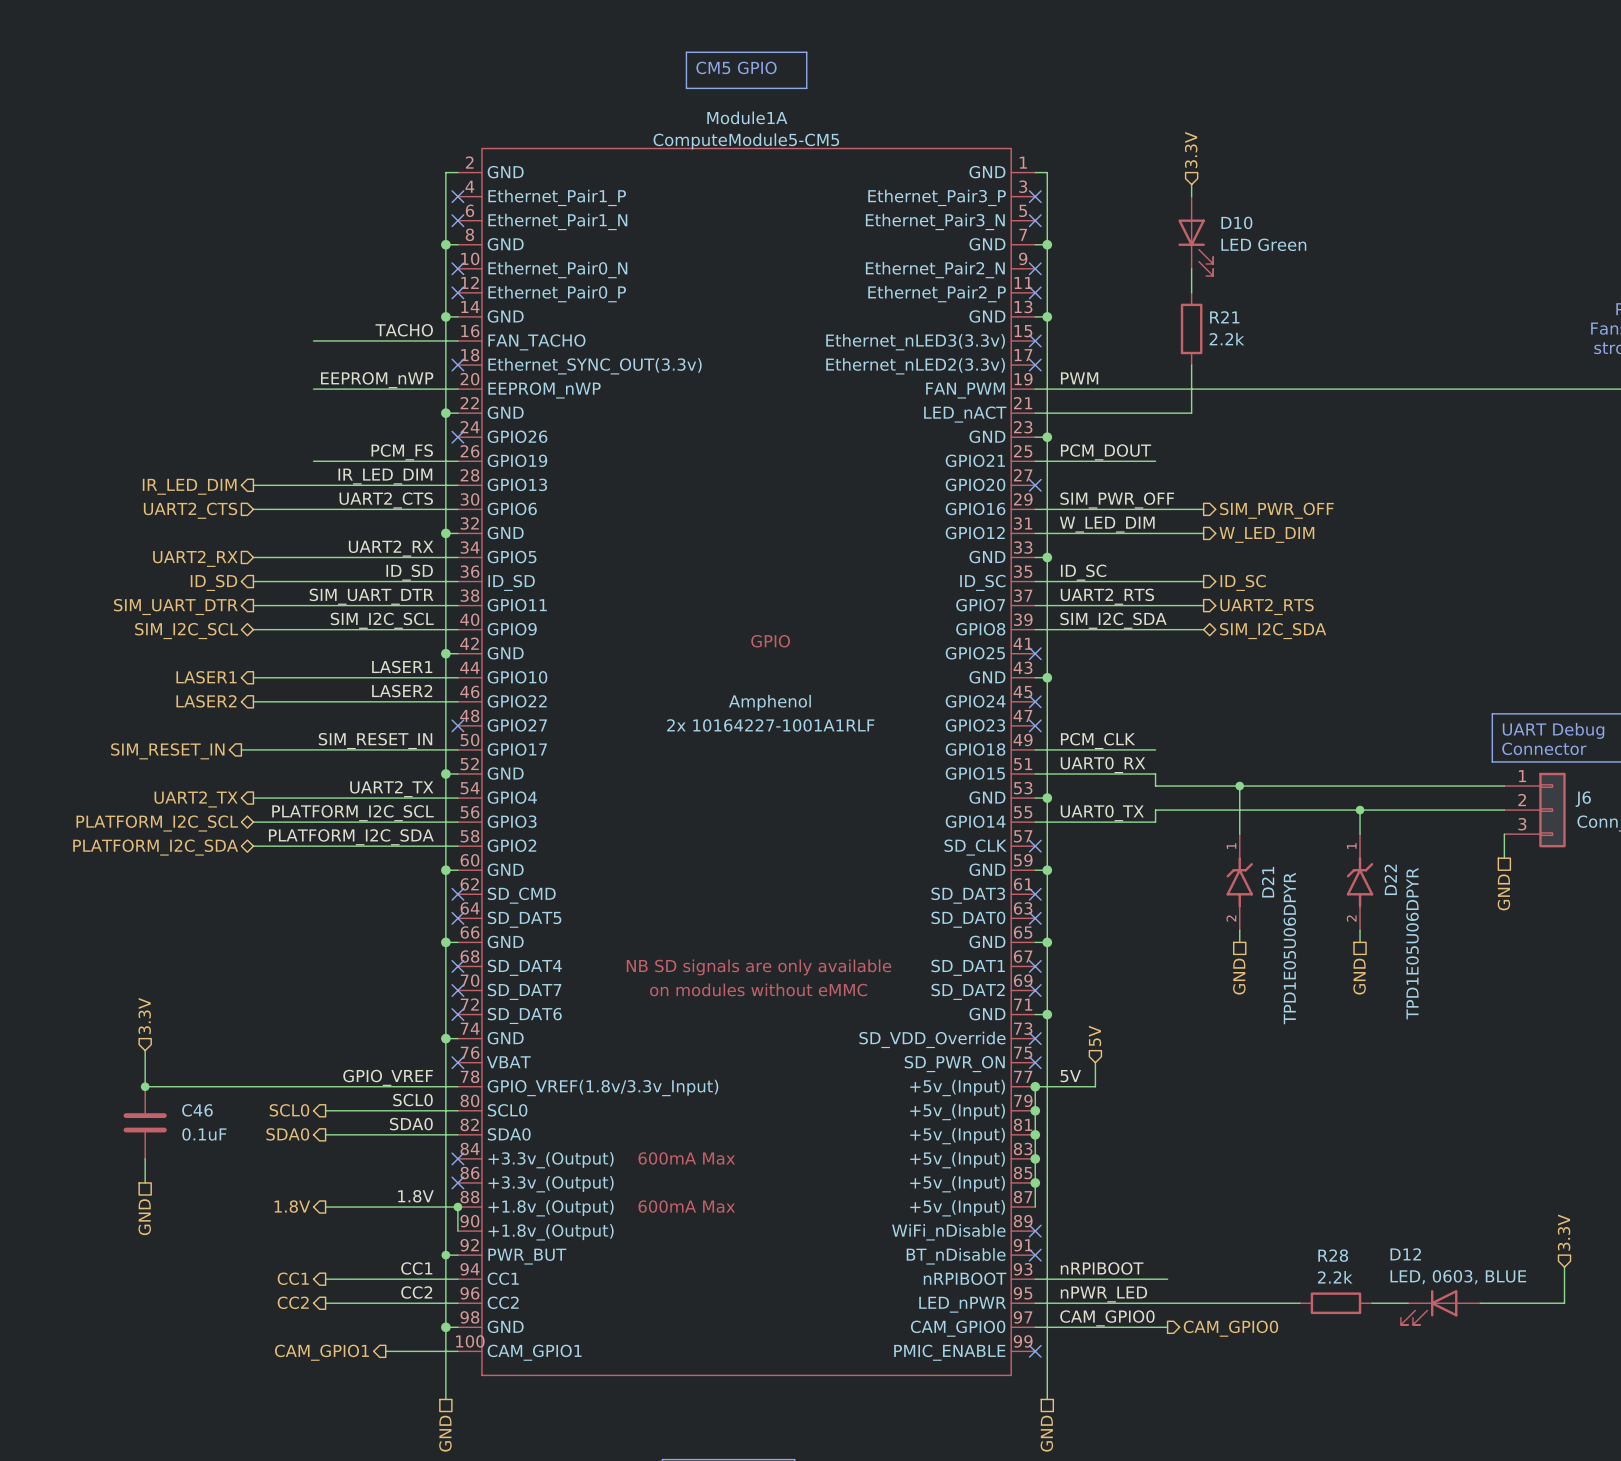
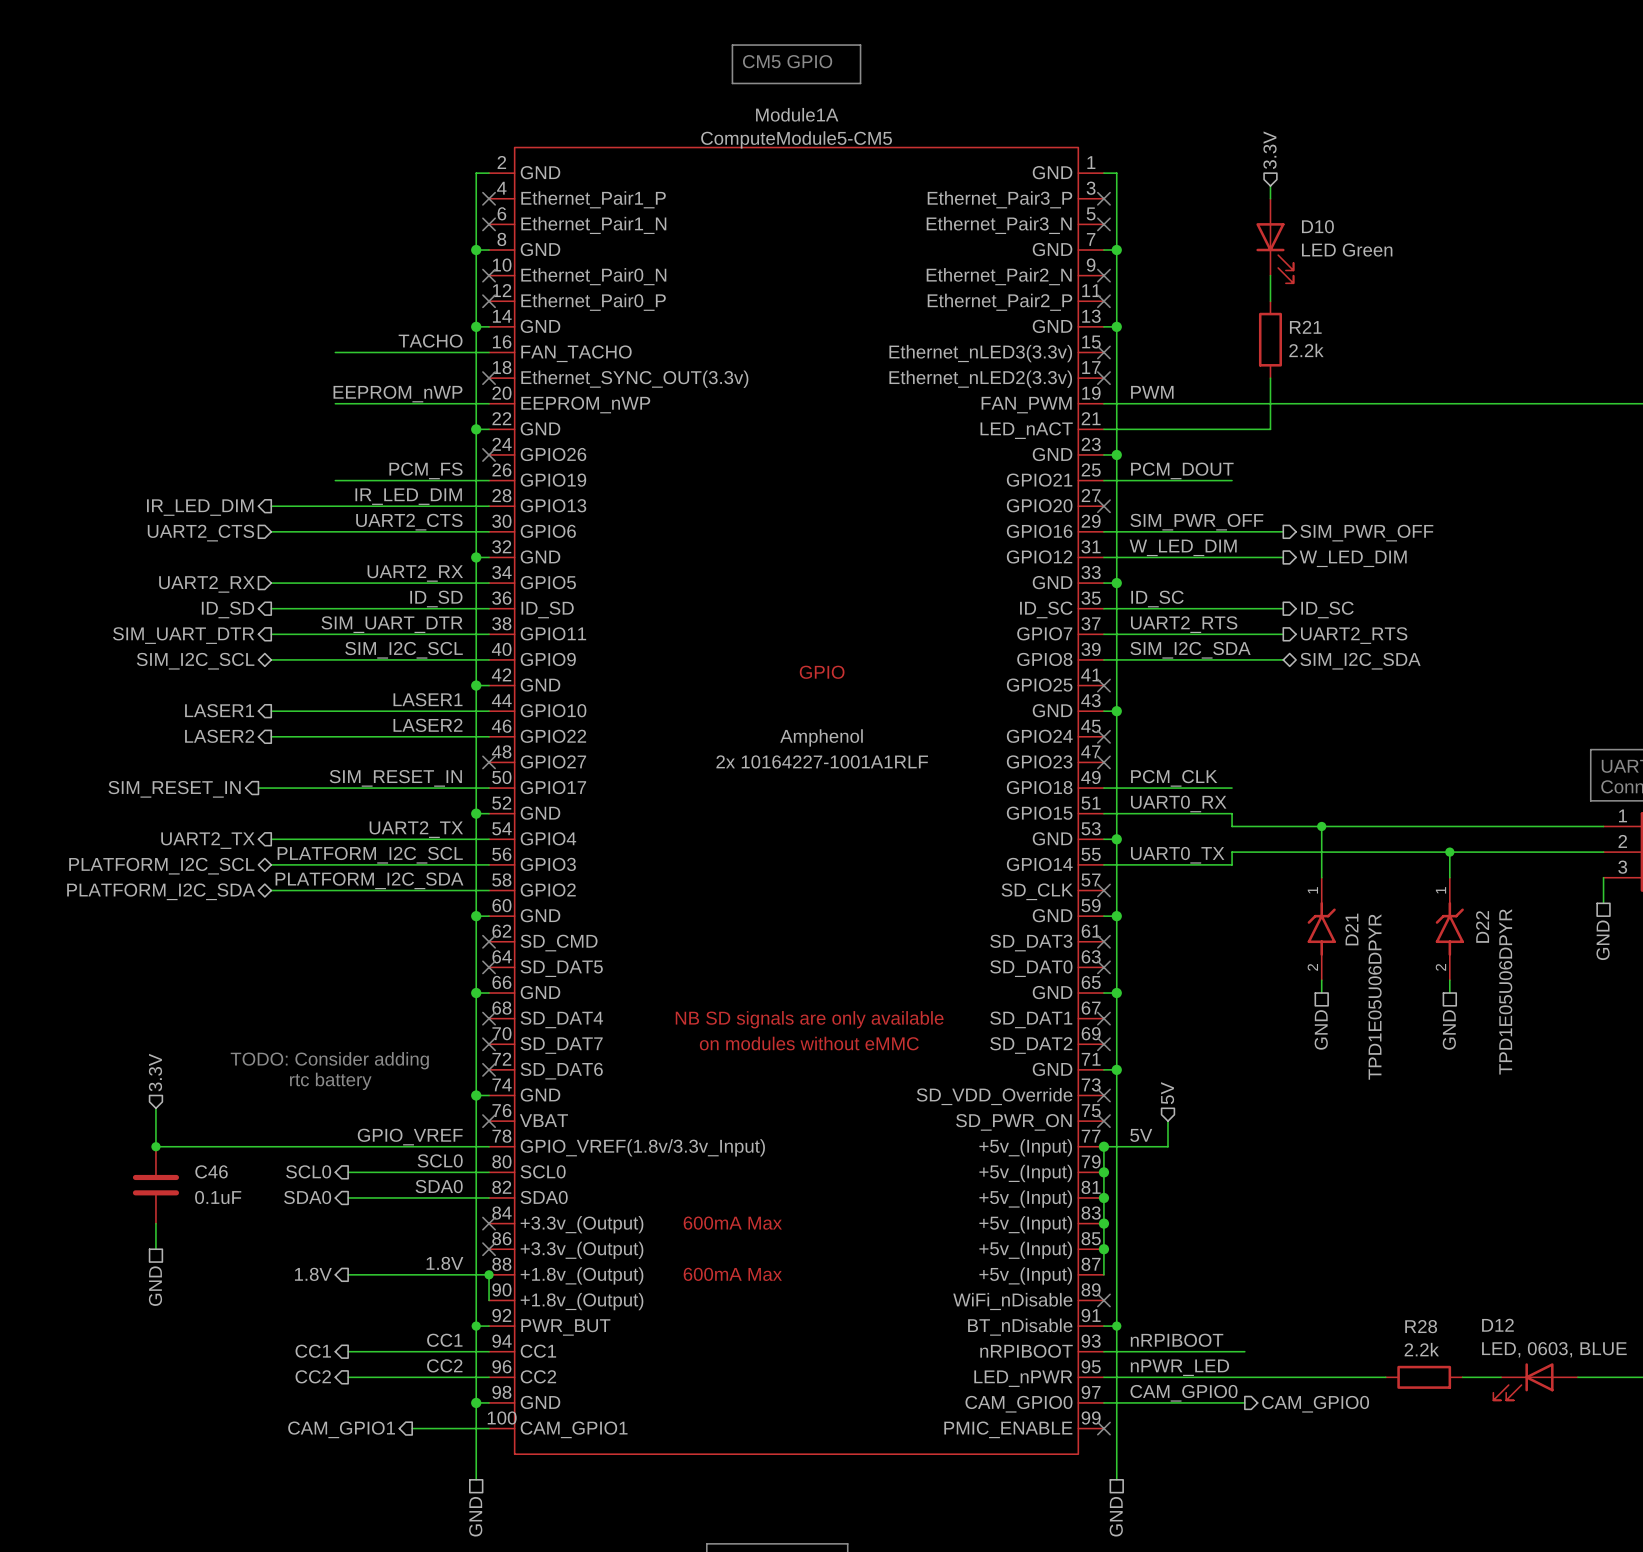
text: none -> TODO: Consider adding (329, 1060)
text: none -> rtc battery (330, 1081)
wire: none -> (1103, 1326) (1116, 1326)
no-connect mark: (1035, 1255) -> none
junction: none -> (1116, 1326)

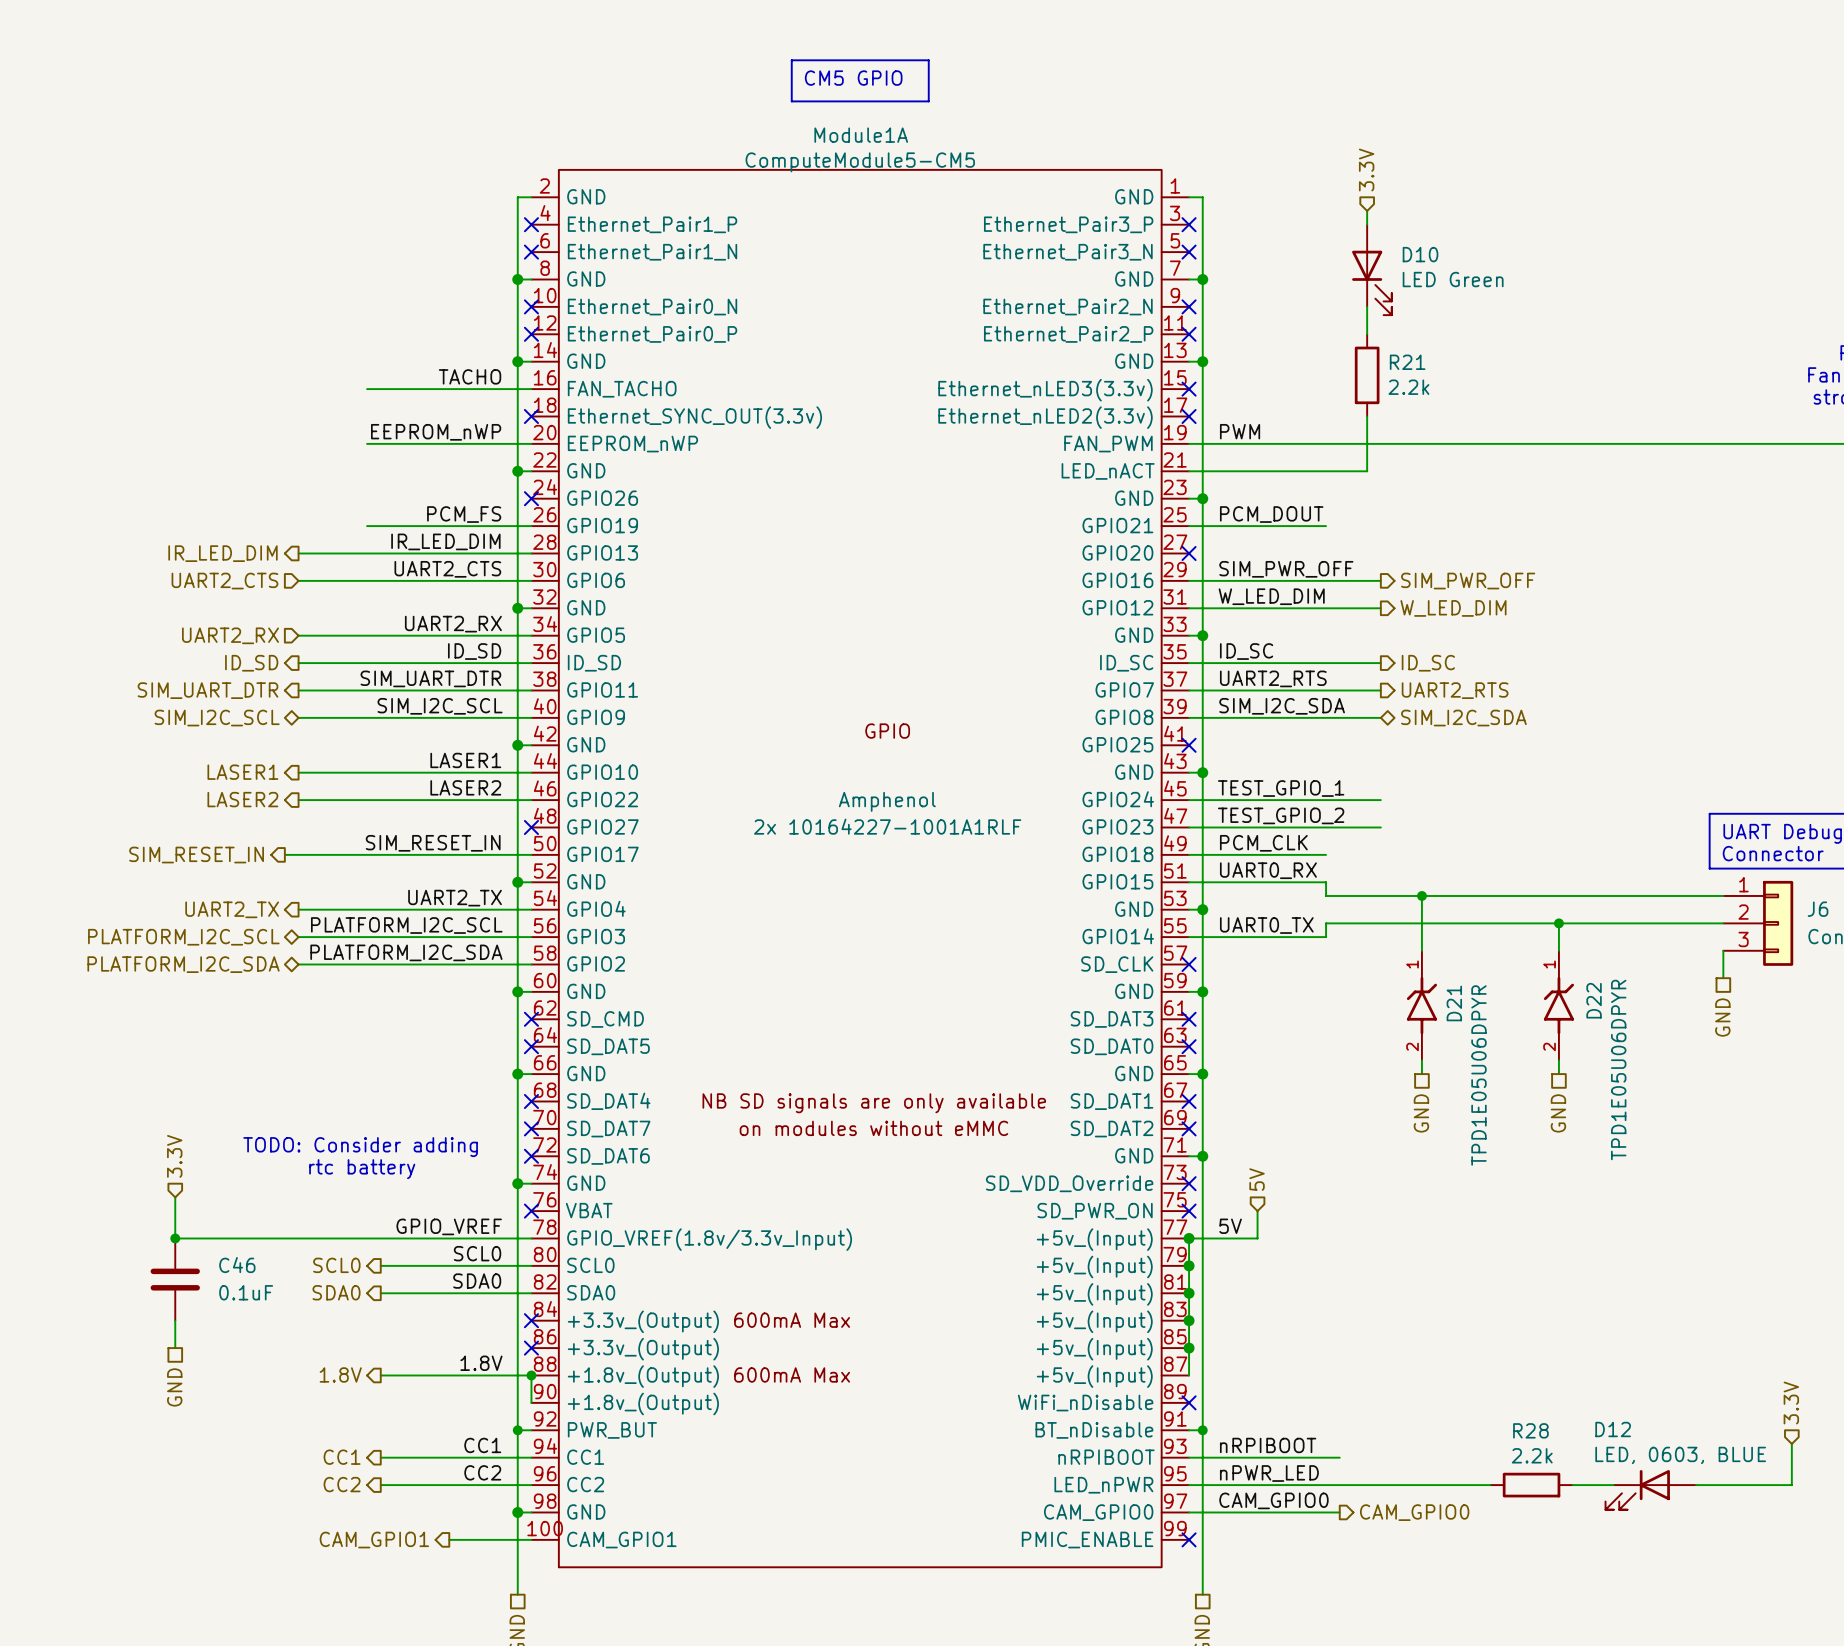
label: none -> TEST_GPIO_1 (1281, 788)
wire: none -> (1189, 800) (1380, 800)
no-connect mark: (1103, 736) -> none
label: none -> TEST_GPIO_2 (1281, 815)
wire: none -> (1189, 827) (1380, 827)
no-connect mark: (1103, 762) -> none

